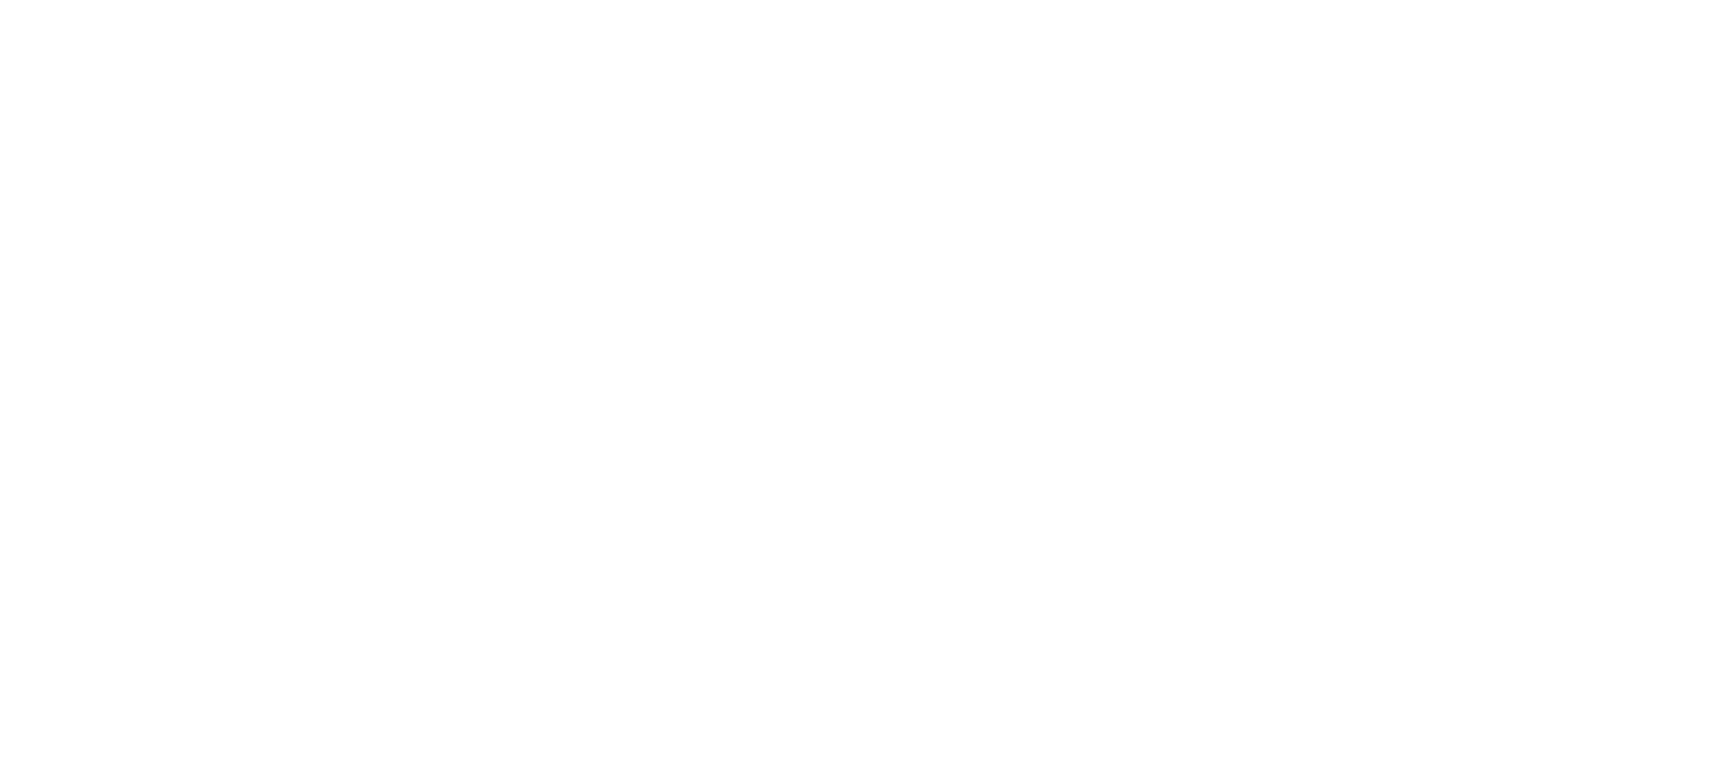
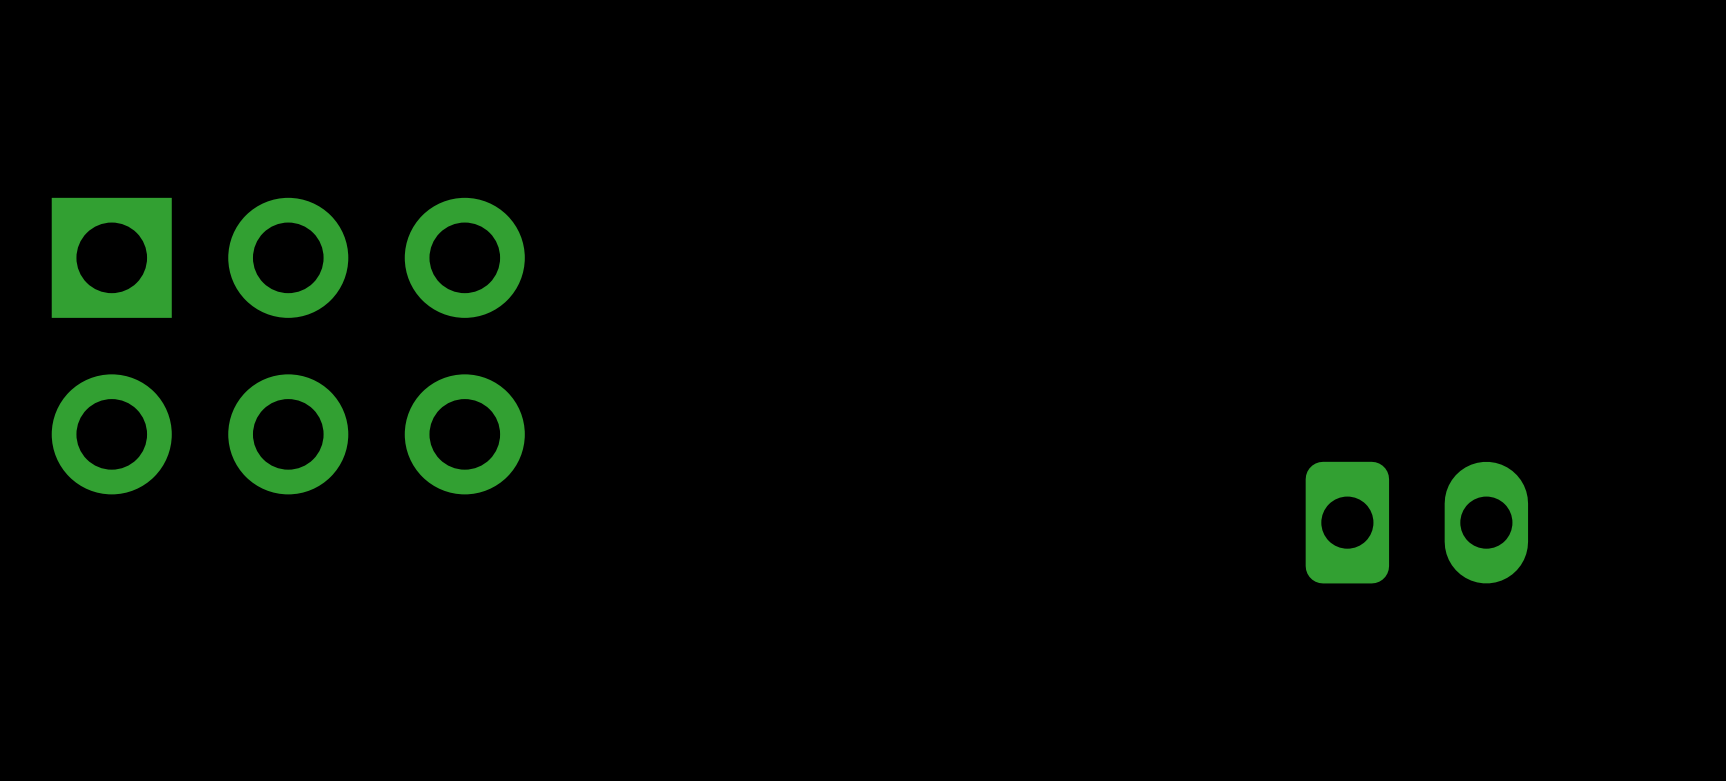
part: none -> (288, 346)
part: none -> (1416, 522)

